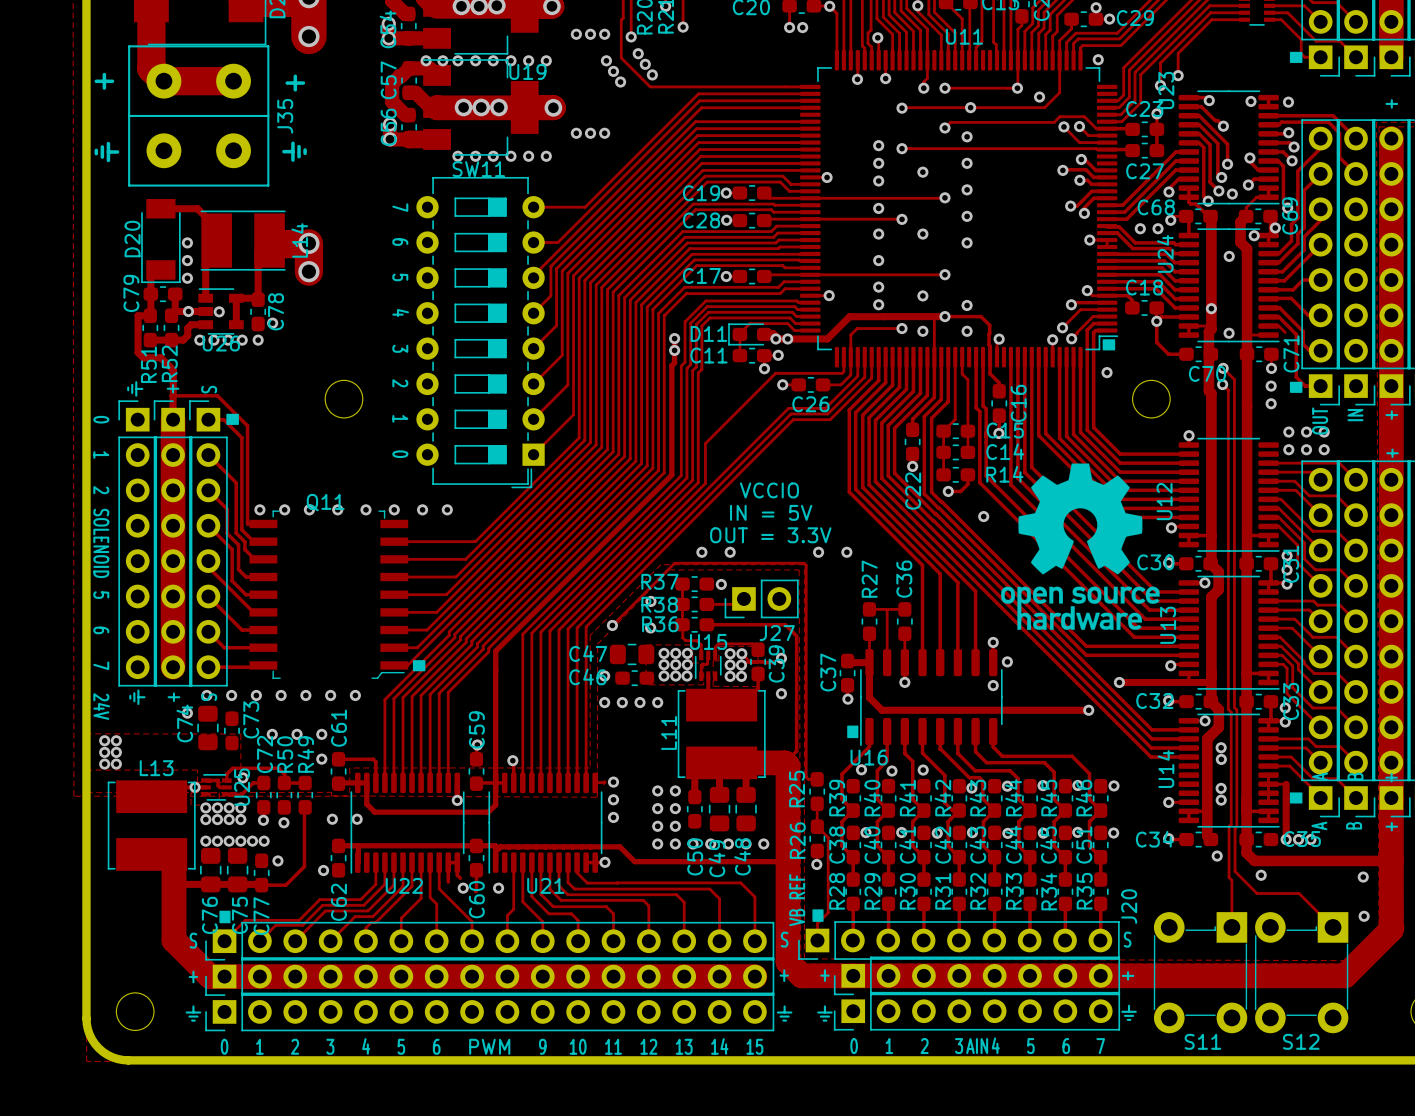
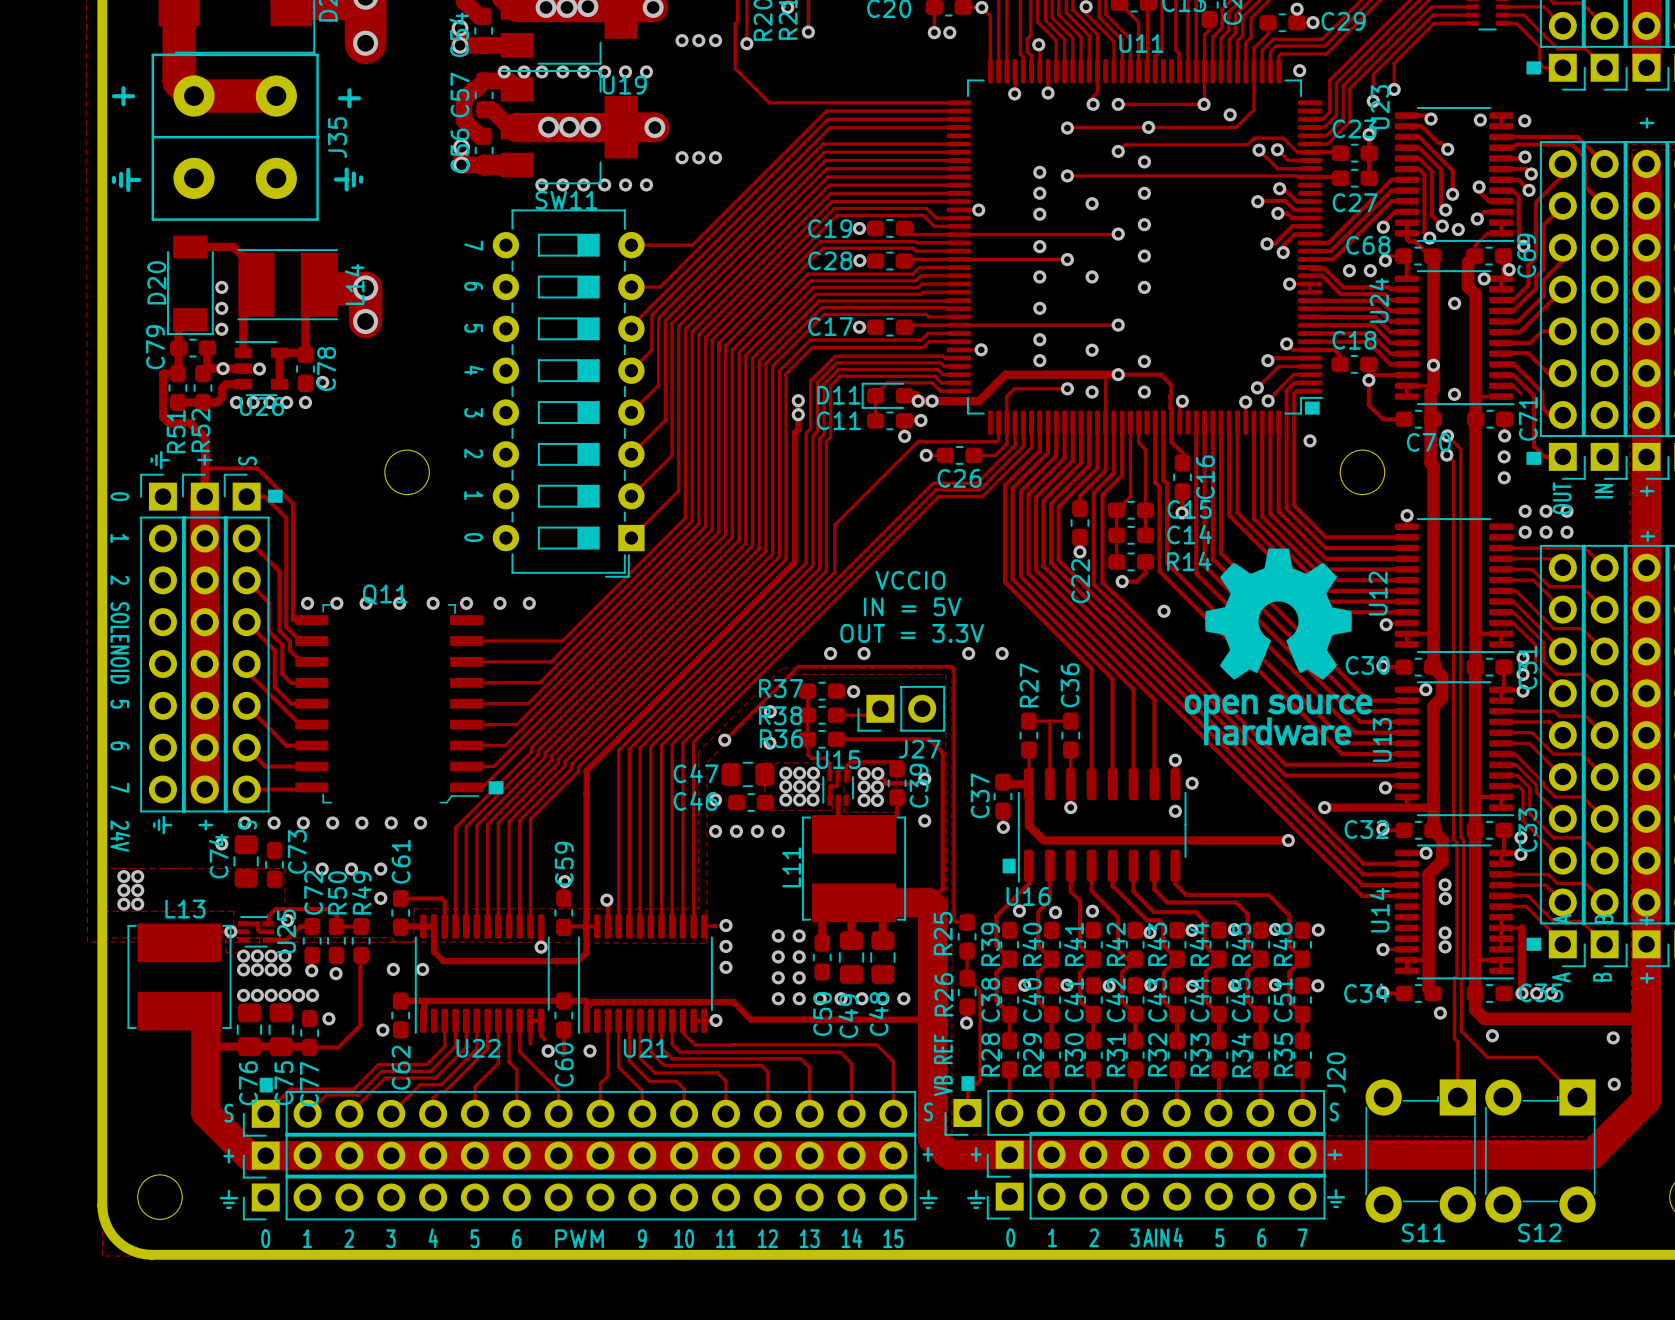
via: (638, 53) -> none
via: (606, 60) -> none
via: (645, 64) -> none
via: (613, 71) -> none
via: (652, 74) -> none
via: (620, 82) -> none

